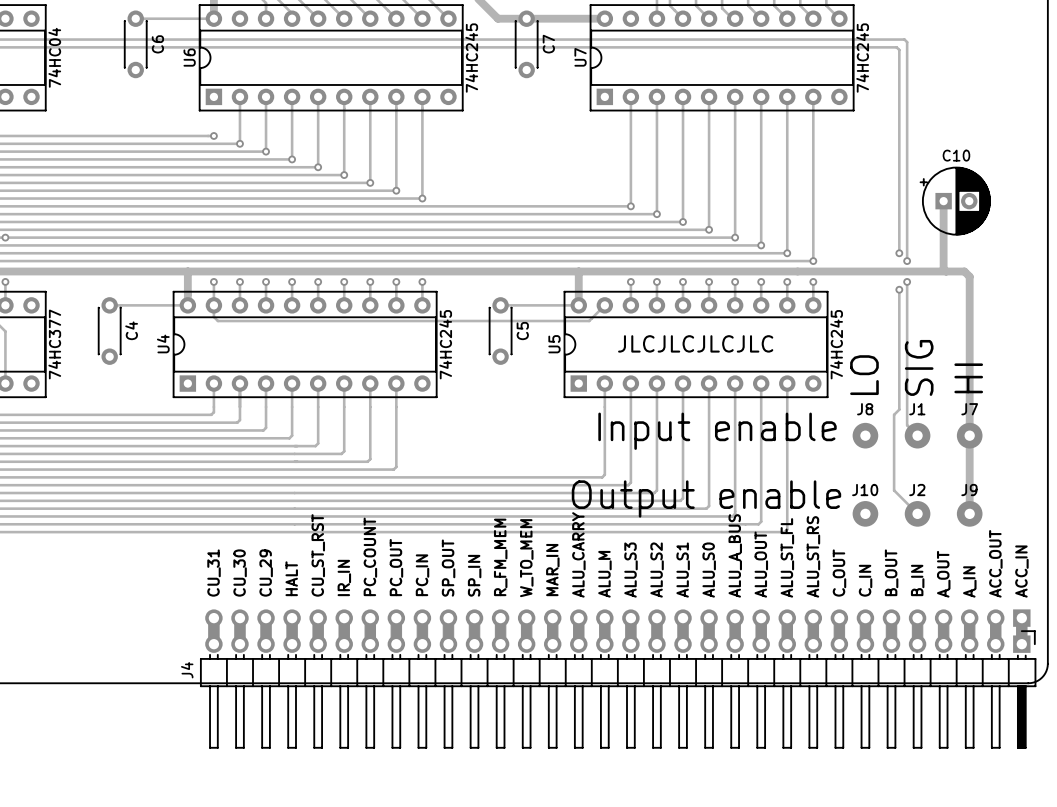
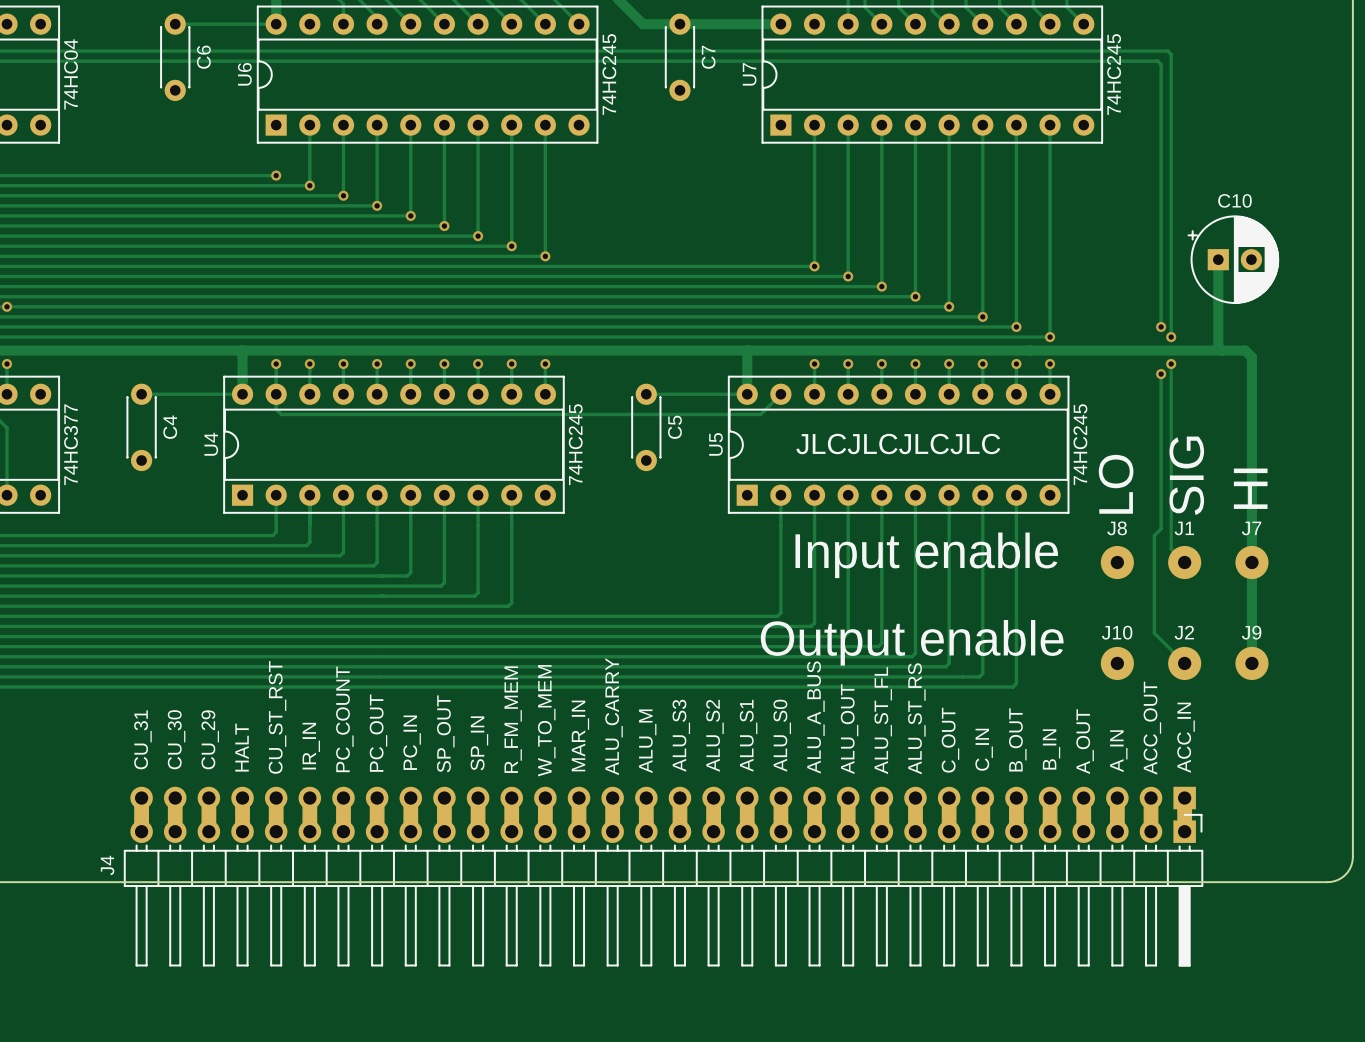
J4 position: (618, 678) -> (663, 876)

